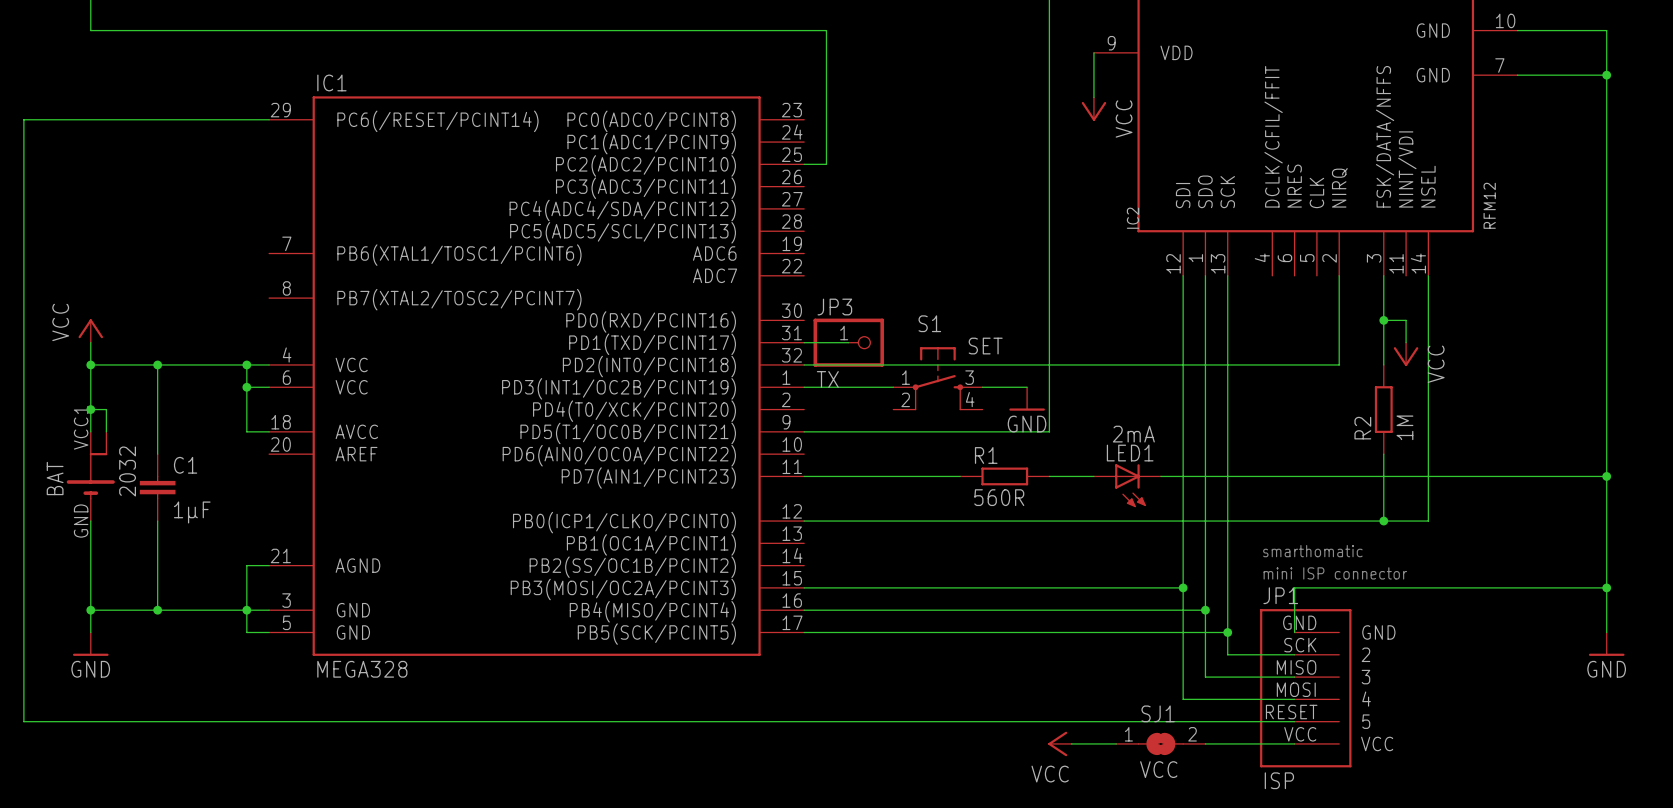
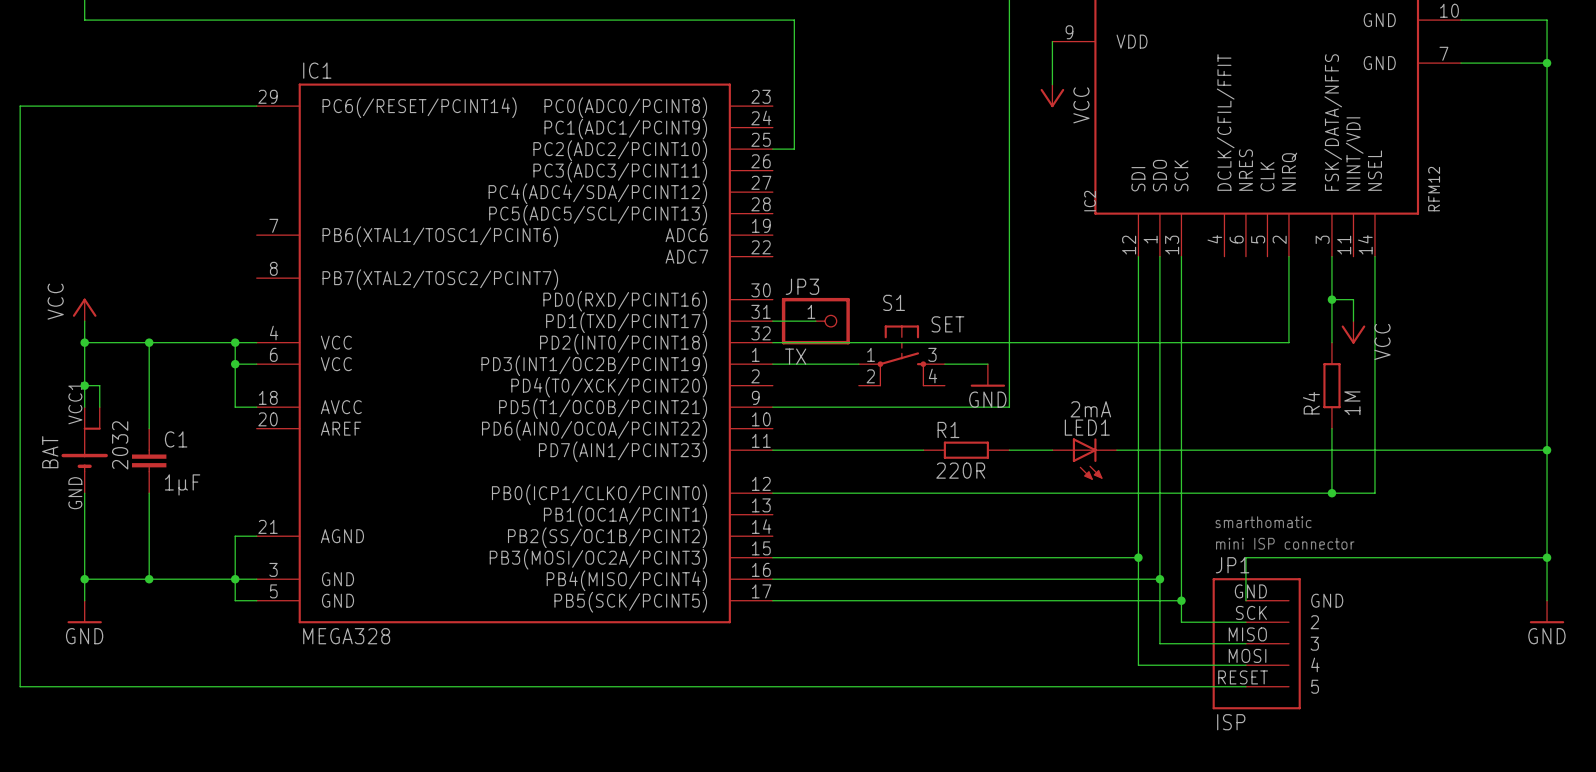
R2 name: R2 (1362, 428) -> R4 (1311, 403)
R1 value: 560R (999, 497) -> 220R (960, 470)
JP1 symbol: [1260, 609, 1352, 768] -> [1212, 578, 1301, 710]
power symbol: VCC (1059, 743) -> none
wire: (1071, 743) (1116, 743) -> none
SJ1: VCC (1160, 743) -> none
wire: (1205, 743) (1294, 743) -> none

